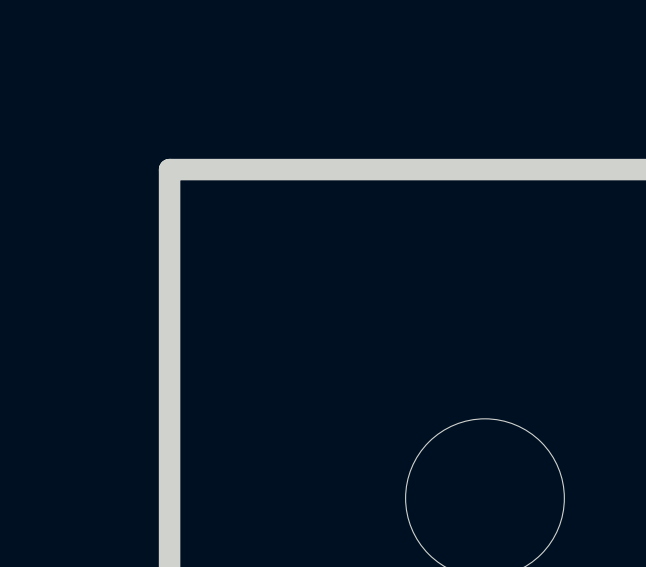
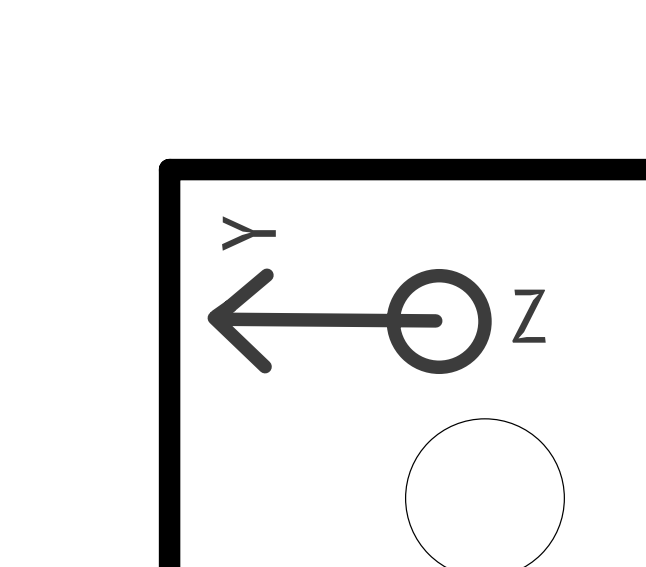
text: none -> Y (248, 233)
drawing: none -> [386, 268, 492, 375]
line: none -> (266, 275) (216, 316)
text: none -> Z (528, 316)
line: none -> (214, 318) (265, 366)
line: none -> (217, 319) (435, 320)

